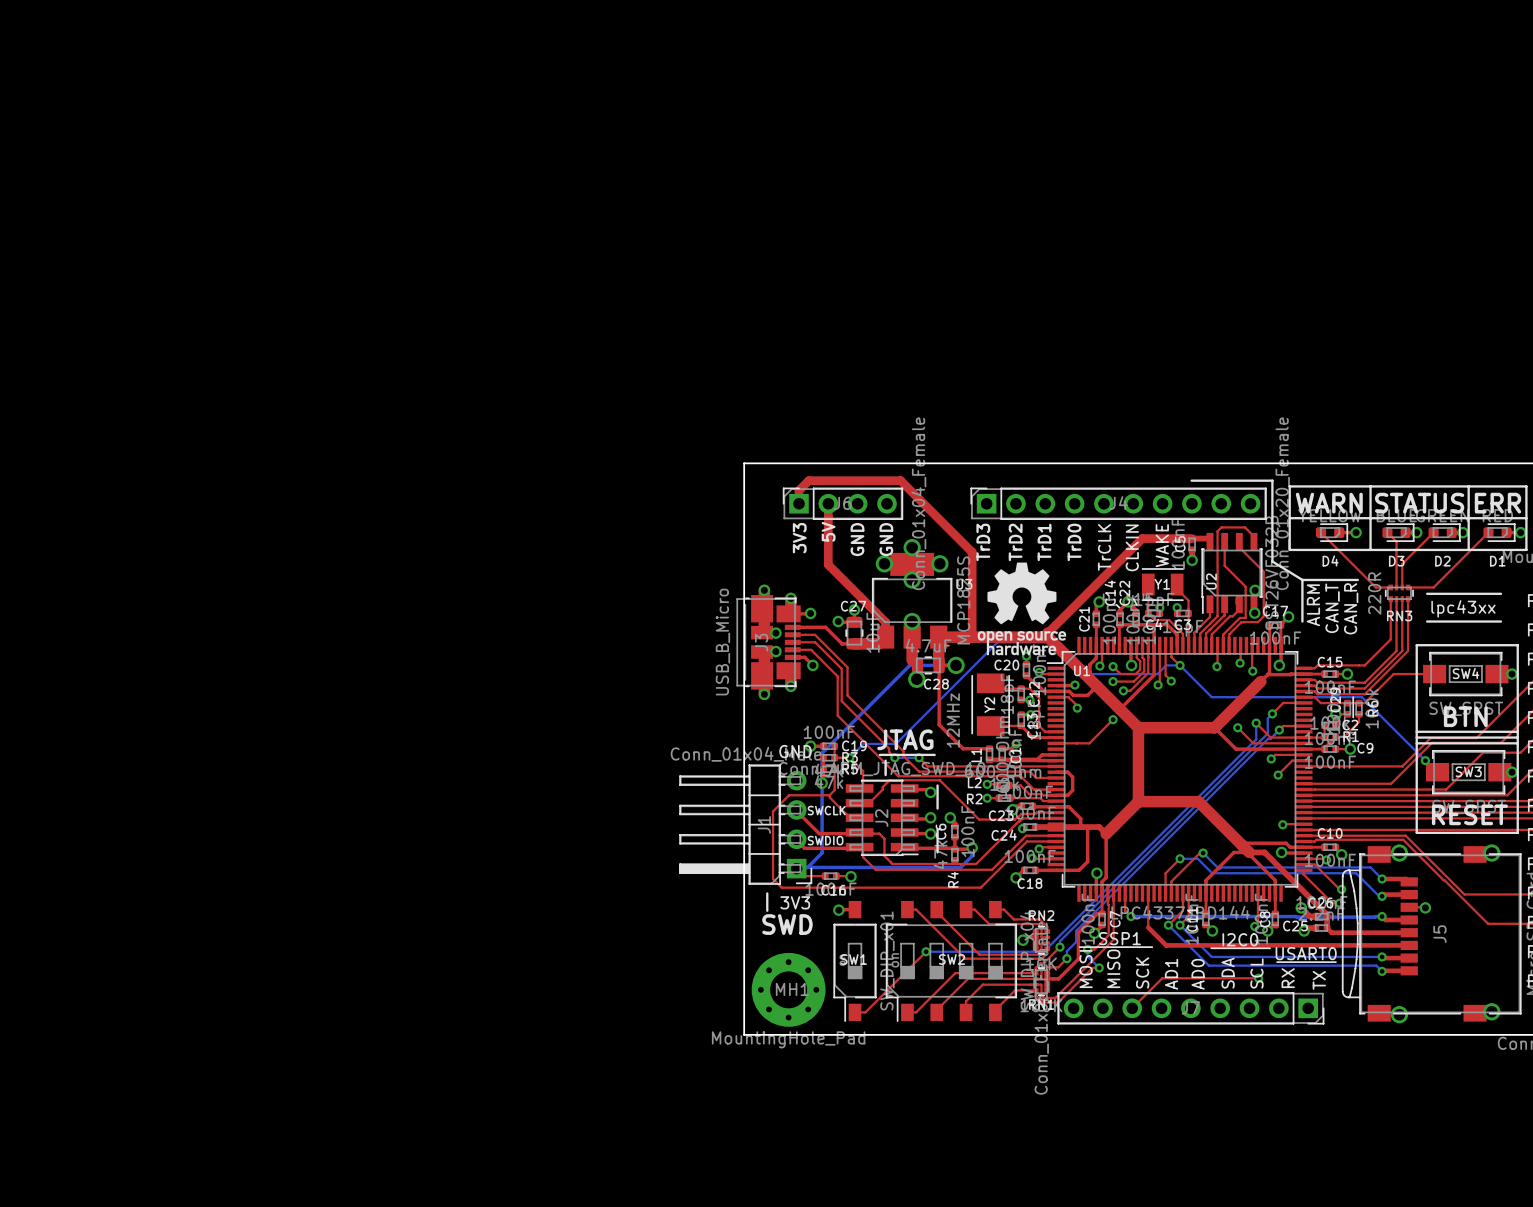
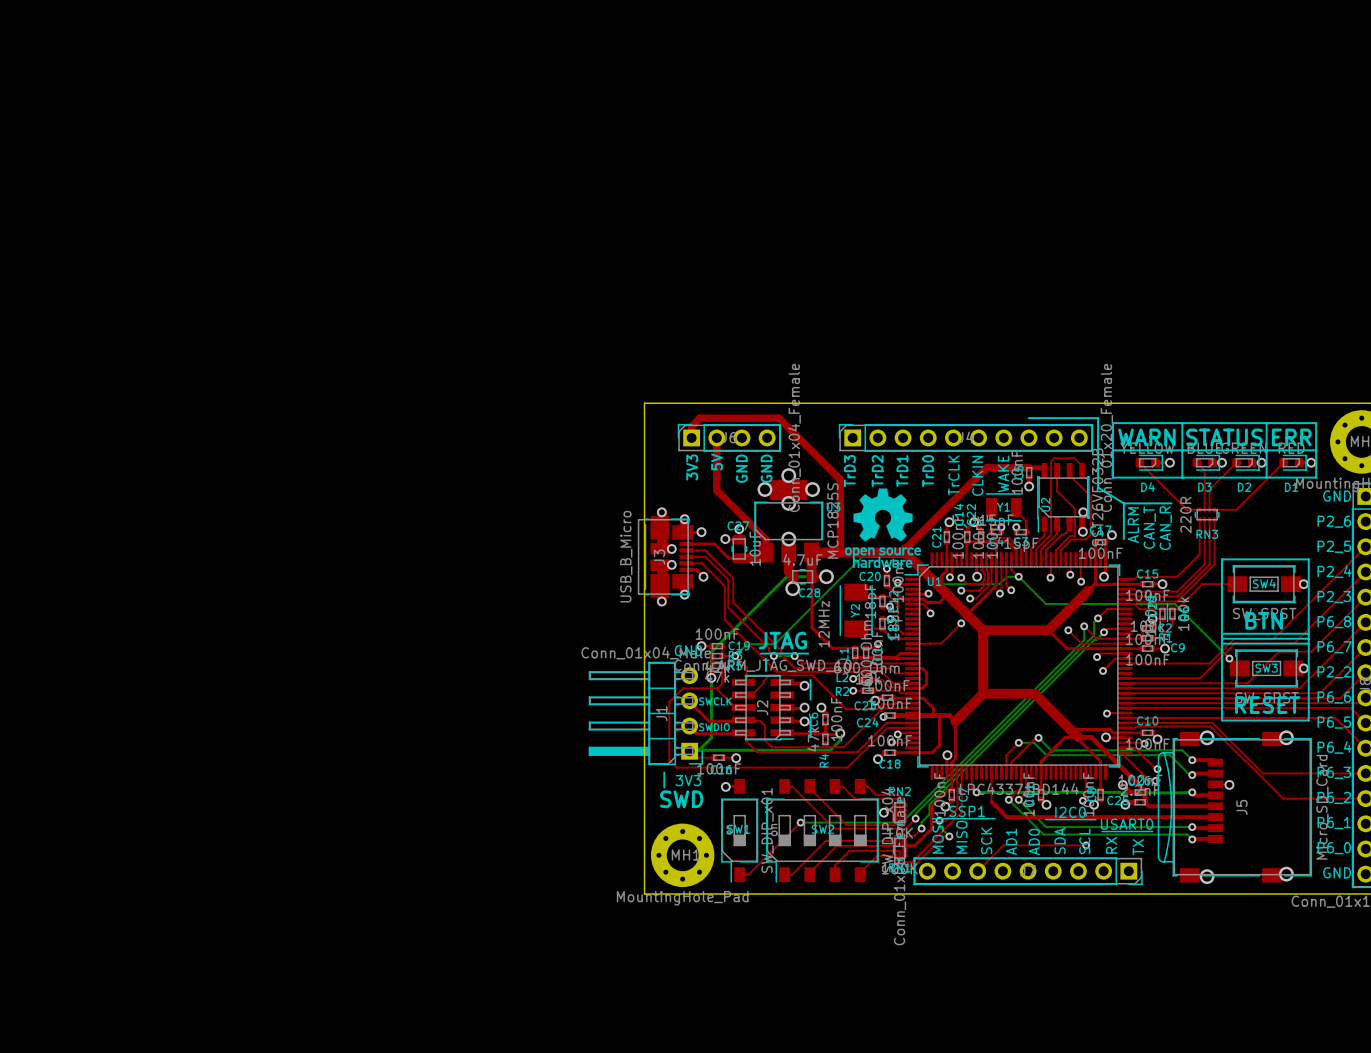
line: (1427, 593) (1501, 593) -> none
text: lpc43xx (1463, 608) -> none
line: (1427, 621) (1501, 621) -> none

